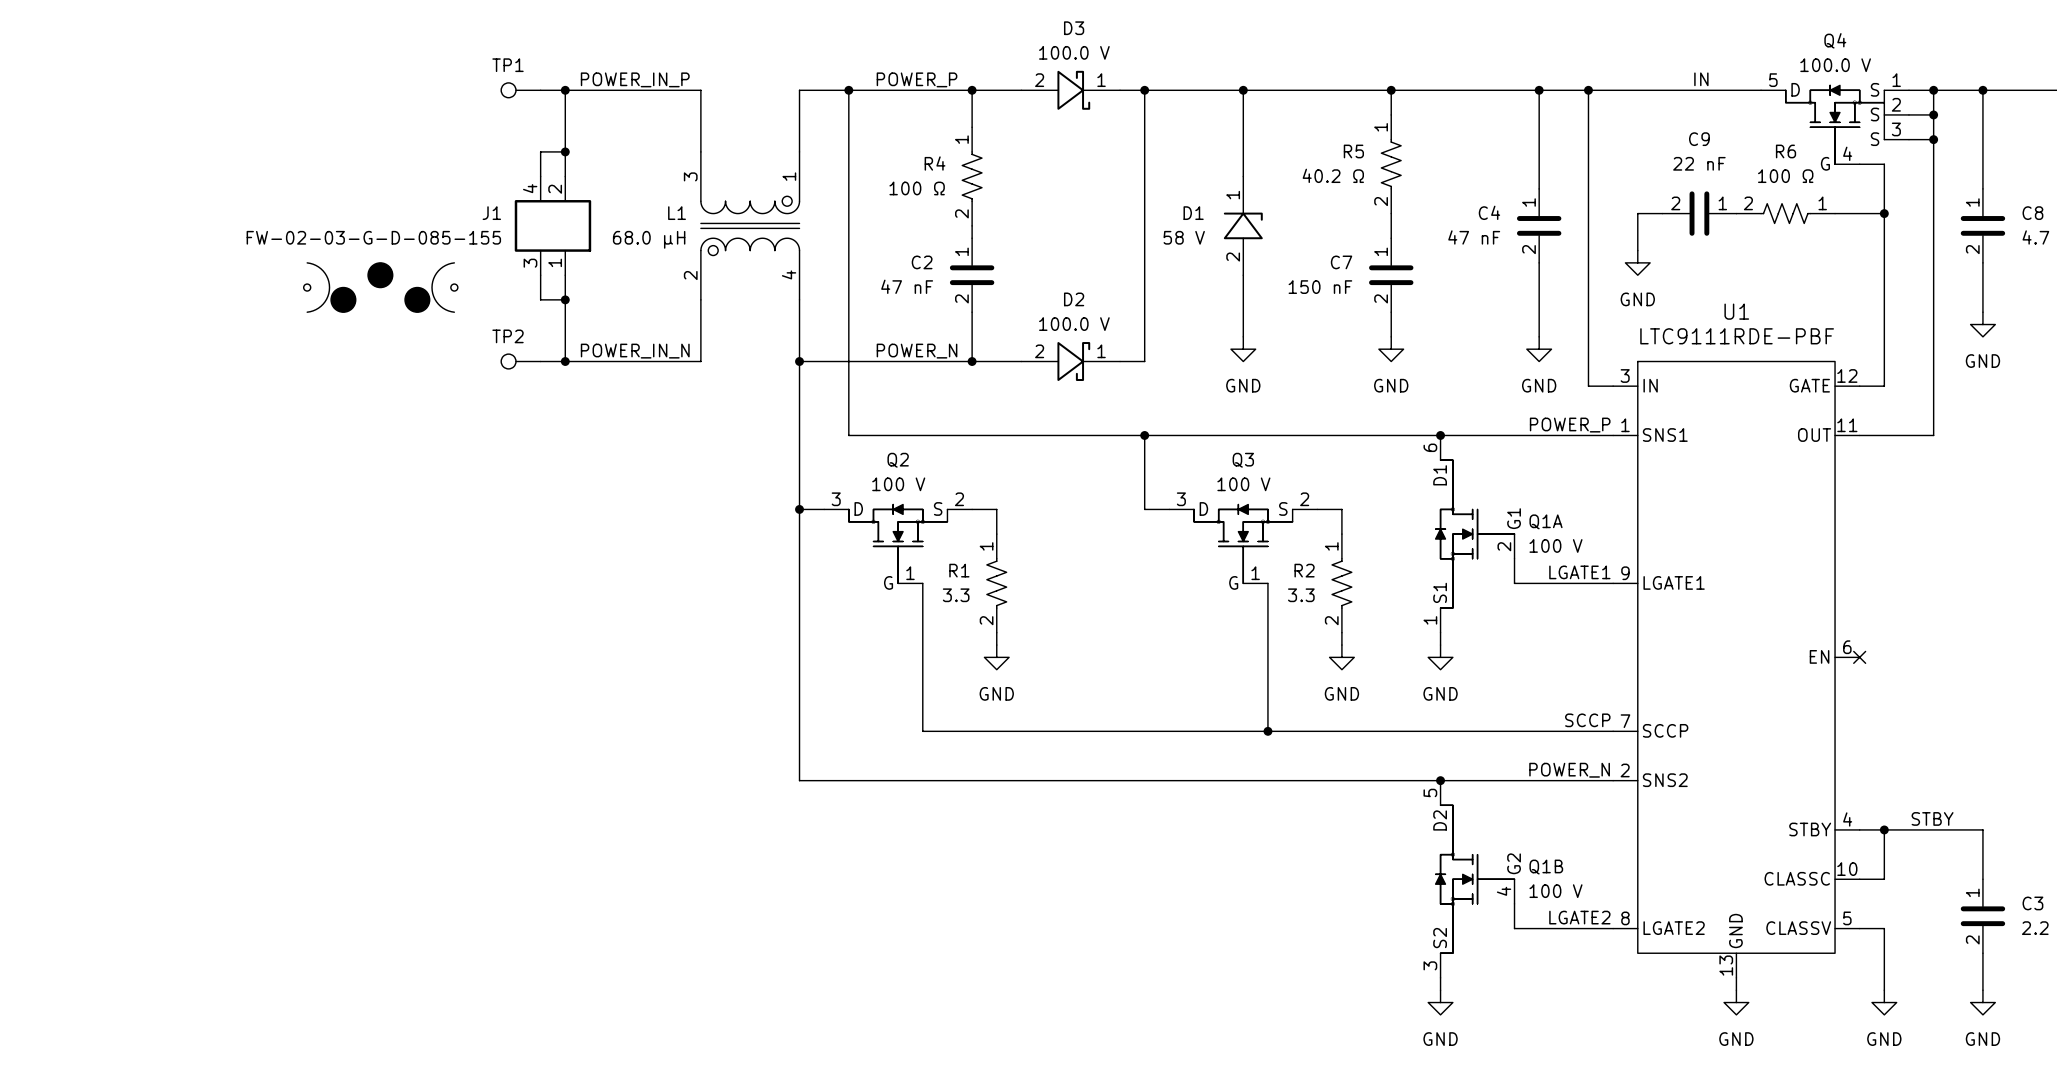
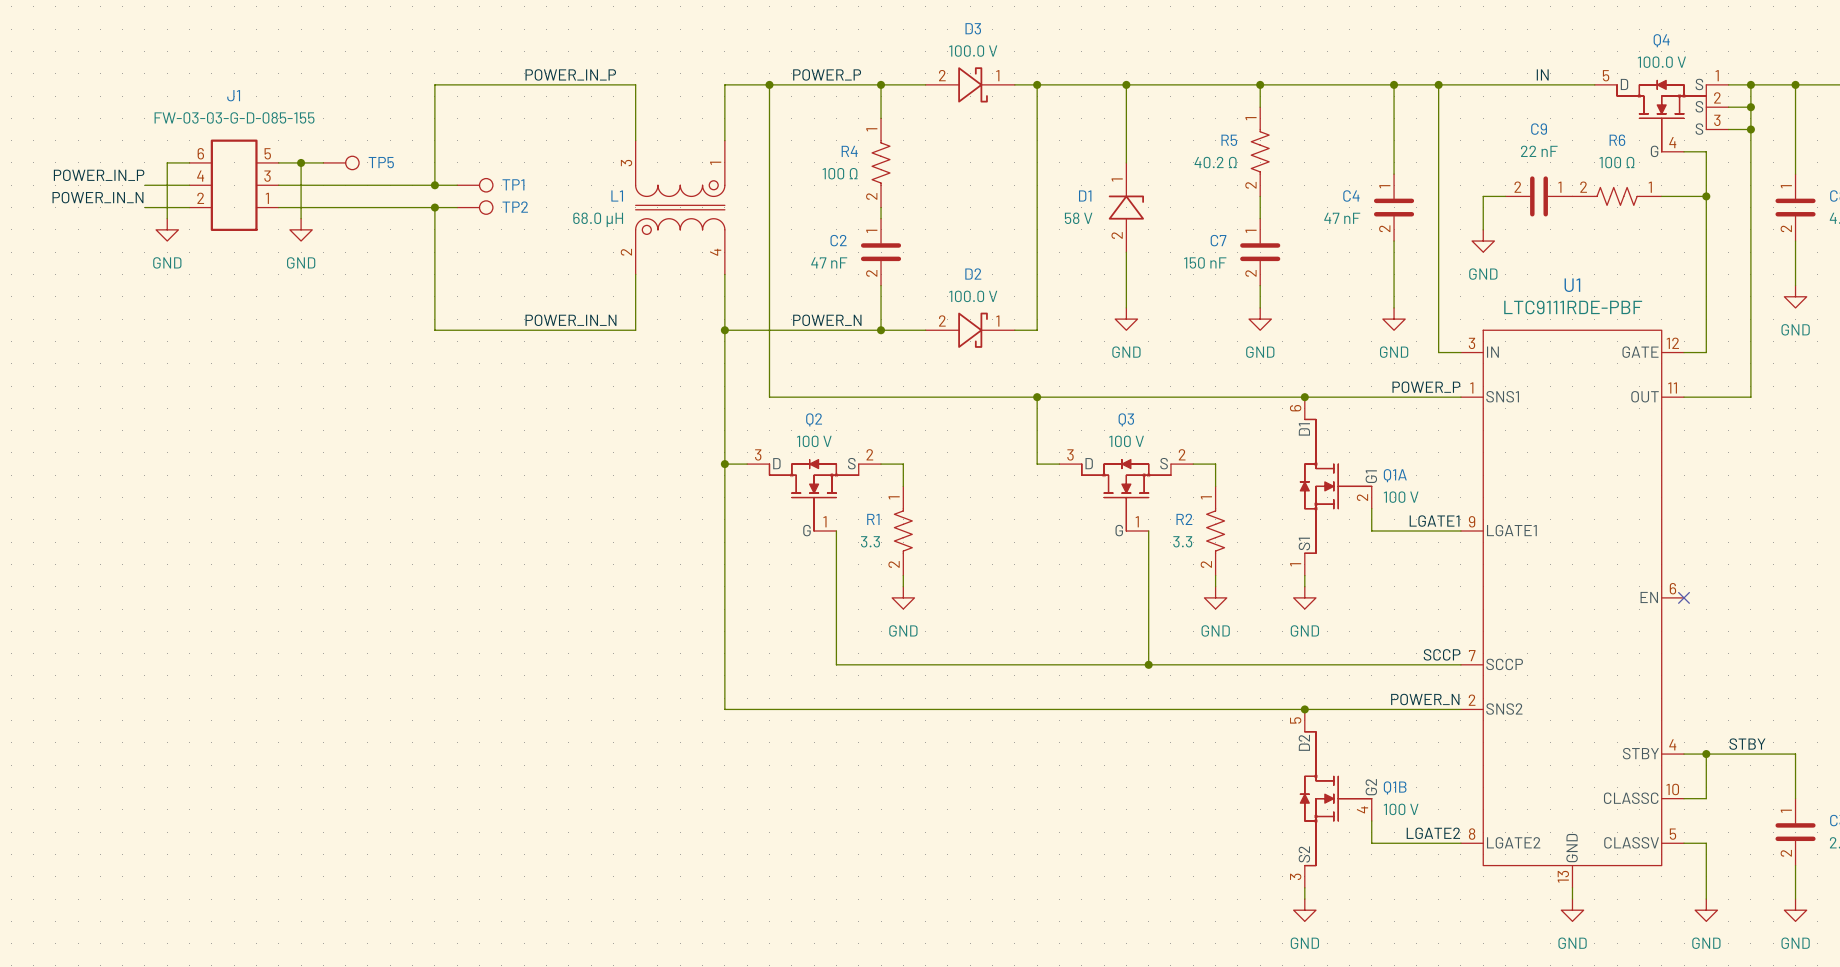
TP1 name position: TP1 (508, 65) -> TP1 (513, 184)
TP1 rotation: 0° (508, 90) -> 180° (486, 185)
TP1 position: (520, 90) -> (475, 185)
wire: none -> (490, 84) (434, 84) (434, 185)
wire: (565, 90) (565, 176) -> none
junction: (565, 90) -> none
wire: (565, 151) (540, 151) (540, 176) -> none
junction: (565, 151) -> none
wire: none -> (189, 162) (167, 162) (167, 218)
wire: none -> (278, 162) (323, 162)
wire: none -> (301, 162) (301, 218)
junction: none -> (301, 162)
TP5: none -> (341, 162)
J1 symbol: [514, 176, 592, 276] -> [189, 139, 279, 231]
label: none -> POWER_IN_P (99, 175)
wire: none -> (144, 185) (189, 185)
wire: none -> (278, 185) (457, 185)
junction: none -> (434, 185)
J1 name position: J1 (491, 213) -> J1 (233, 95)
label: none -> POWER_IN_N (97, 197)
wire: none -> (144, 207) (189, 207)
wire: none -> (278, 207) (457, 207)
wire: none -> (434, 207) (434, 330) (490, 330)
junction: none -> (434, 207)
J1 value: FW-02-03-G-D-085-155 (373, 237) -> FW-03-03-G-D-085-155 (234, 117)
power symbol: none -> GND (167, 229)
power symbol: none -> GND (301, 229)
wire: (540, 275) (540, 299) (565, 299) -> none
wire: (565, 275) (565, 361) -> none
part: (380, 287) -> none
junction: (565, 299) -> none
TP2 name position: TP2 (508, 336) -> TP2 (515, 207)
TP2 rotation: 0° (508, 361) -> 180° (486, 207)
TP2 position: (520, 361) -> (475, 207)
junction: (565, 361) -> none

